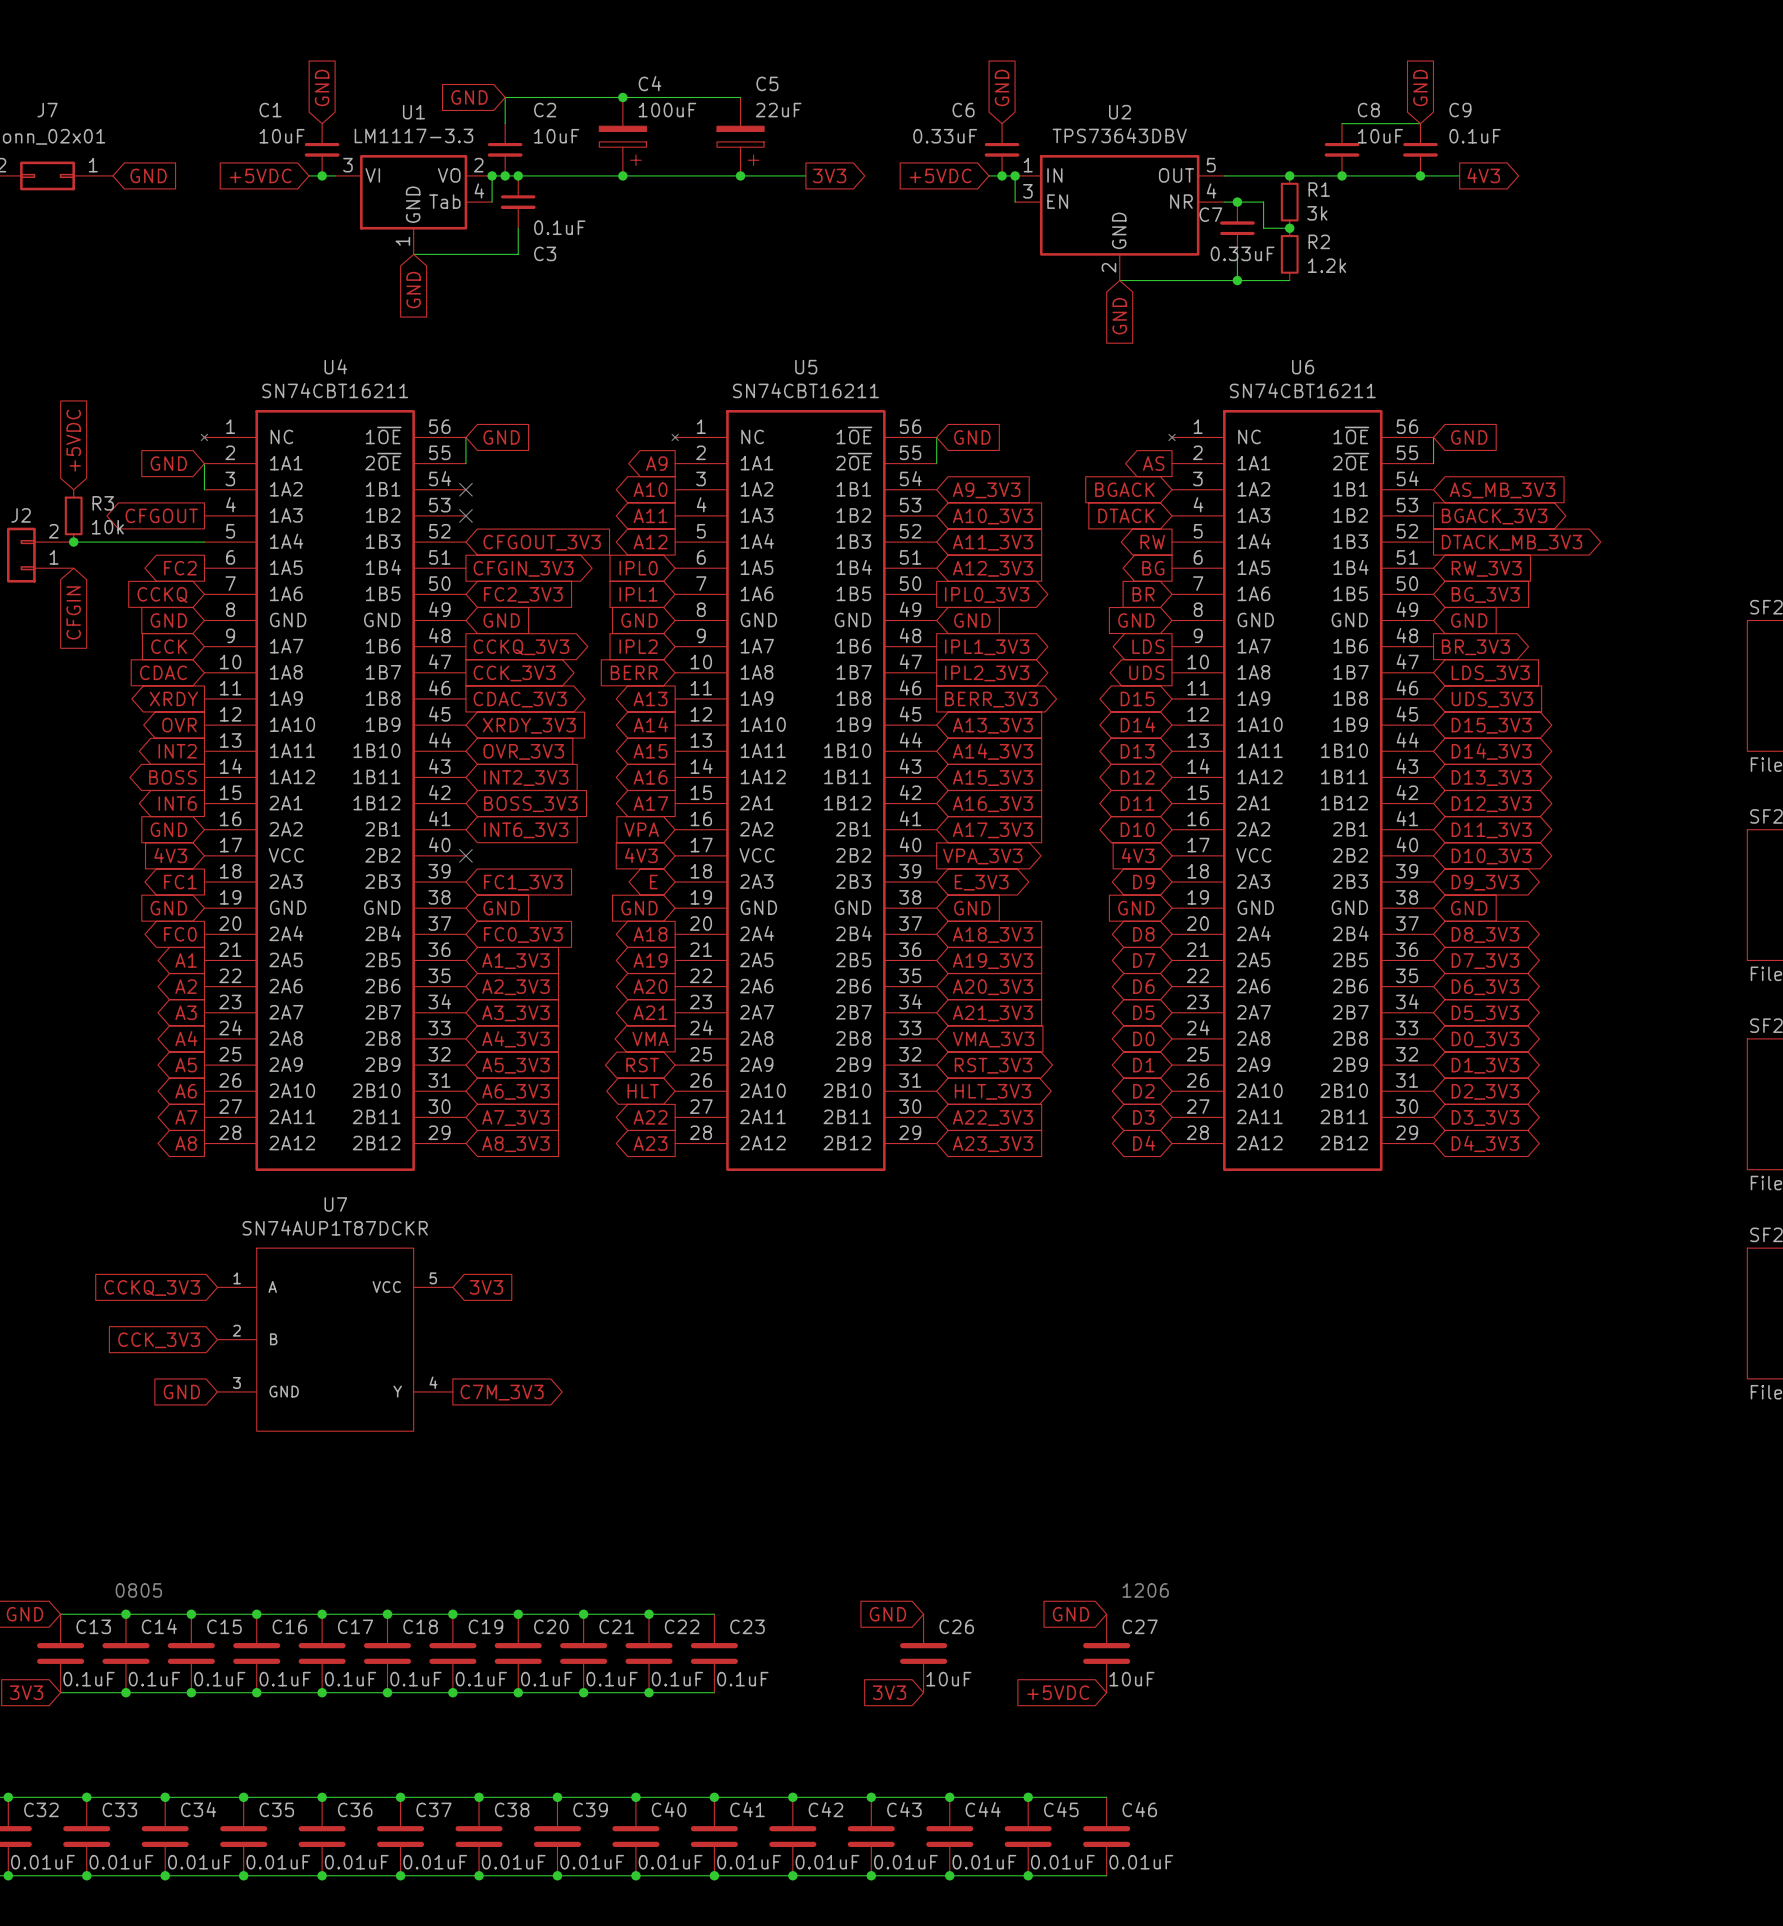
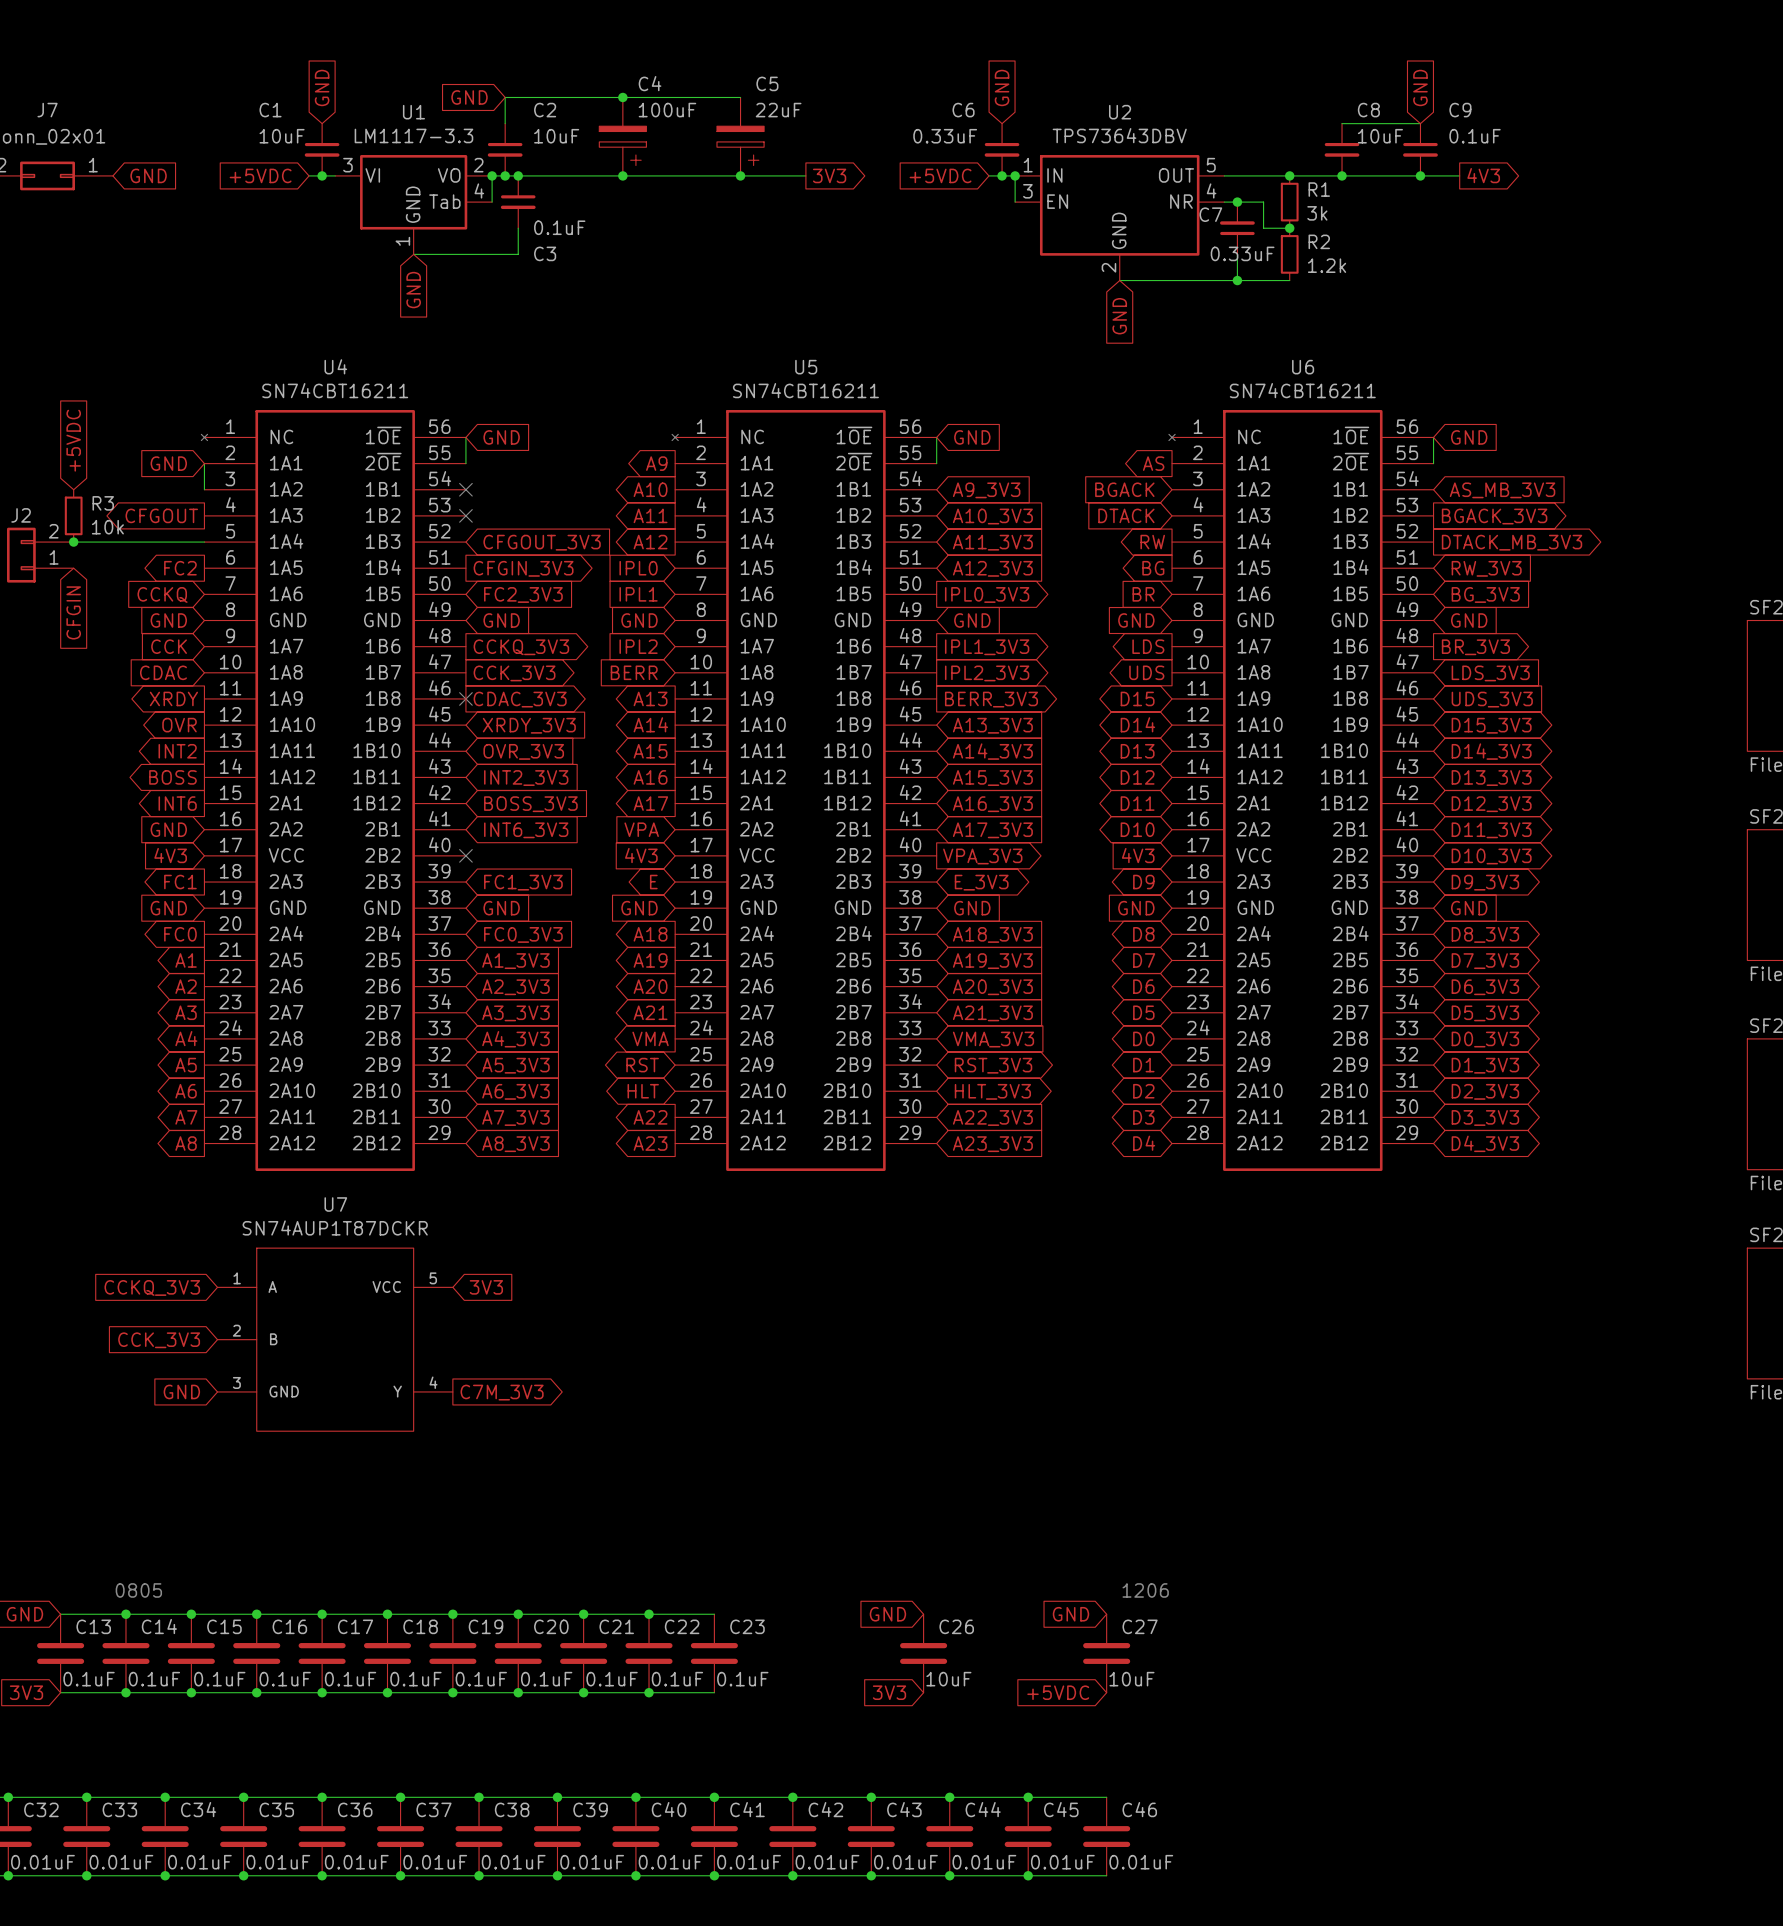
no-connect mark: none -> (465, 698)

